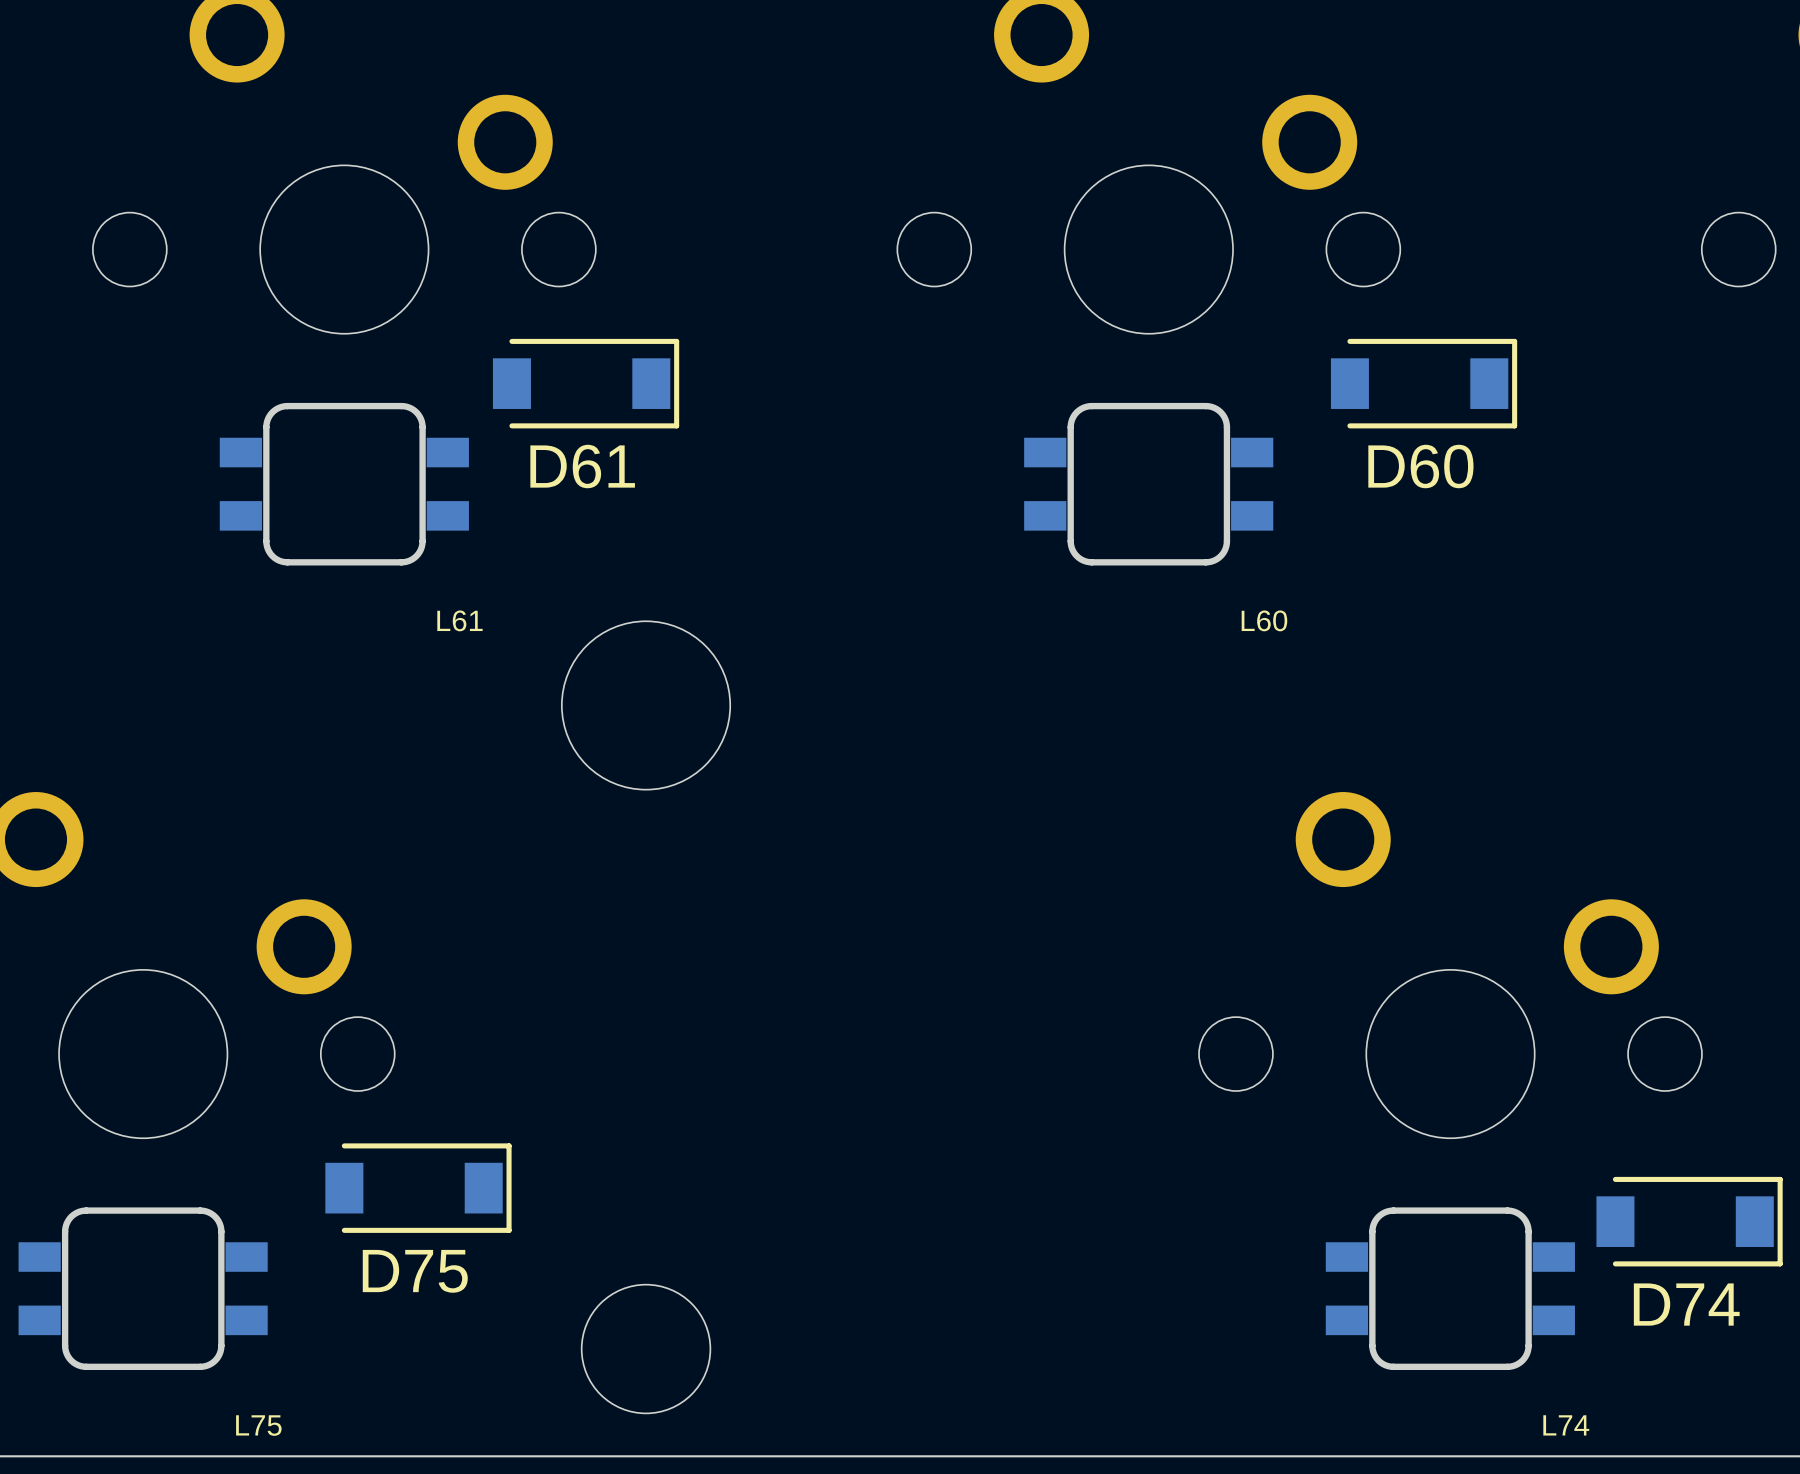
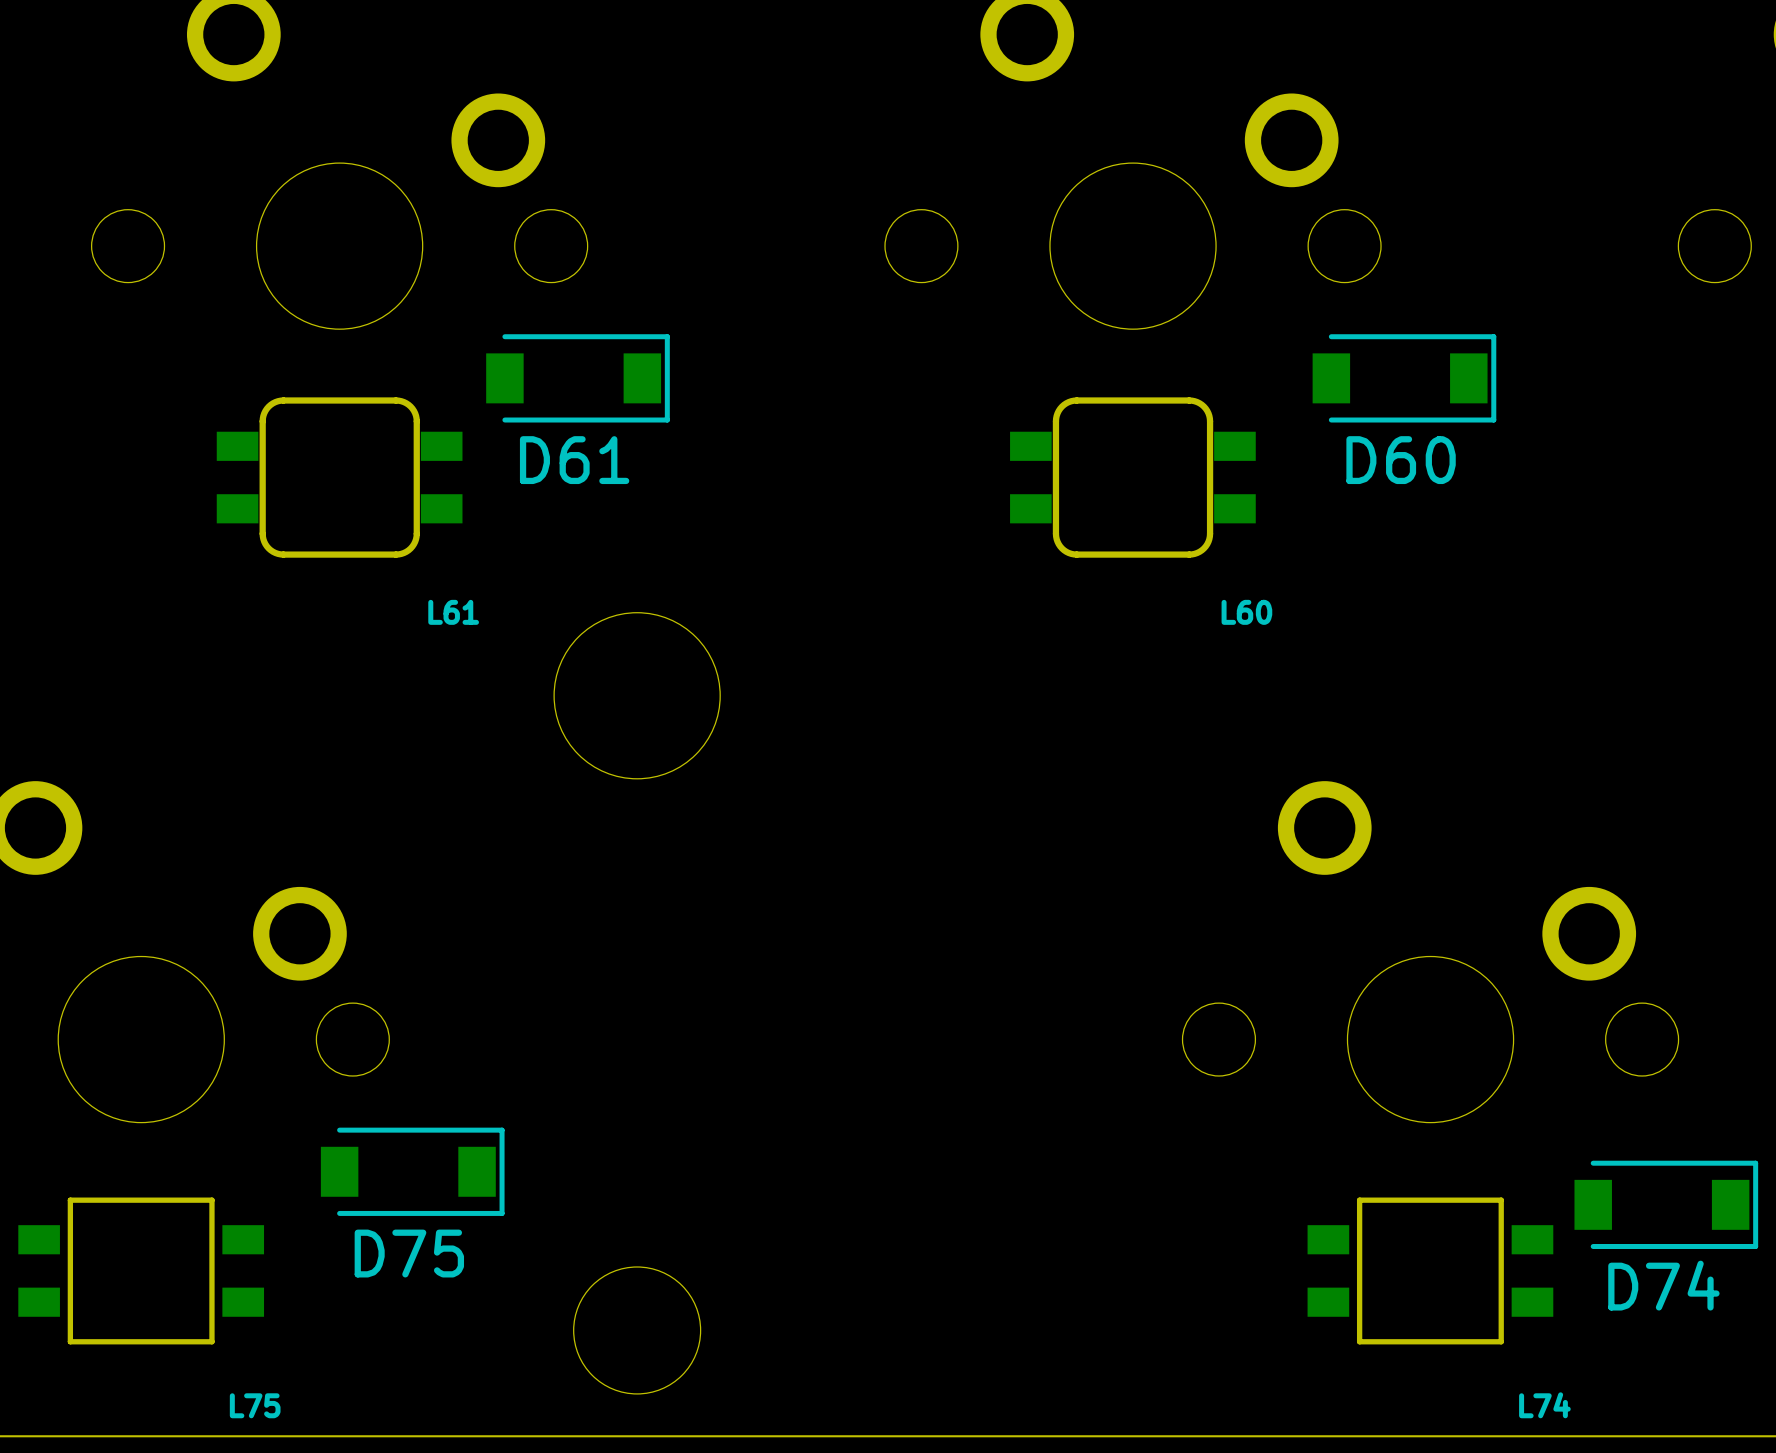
L75 footprint: [18, 1207, 268, 1370] -> [18, 1197, 265, 1345]
L74 footprint: [1325, 1207, 1575, 1370] -> [1307, 1197, 1554, 1345]

